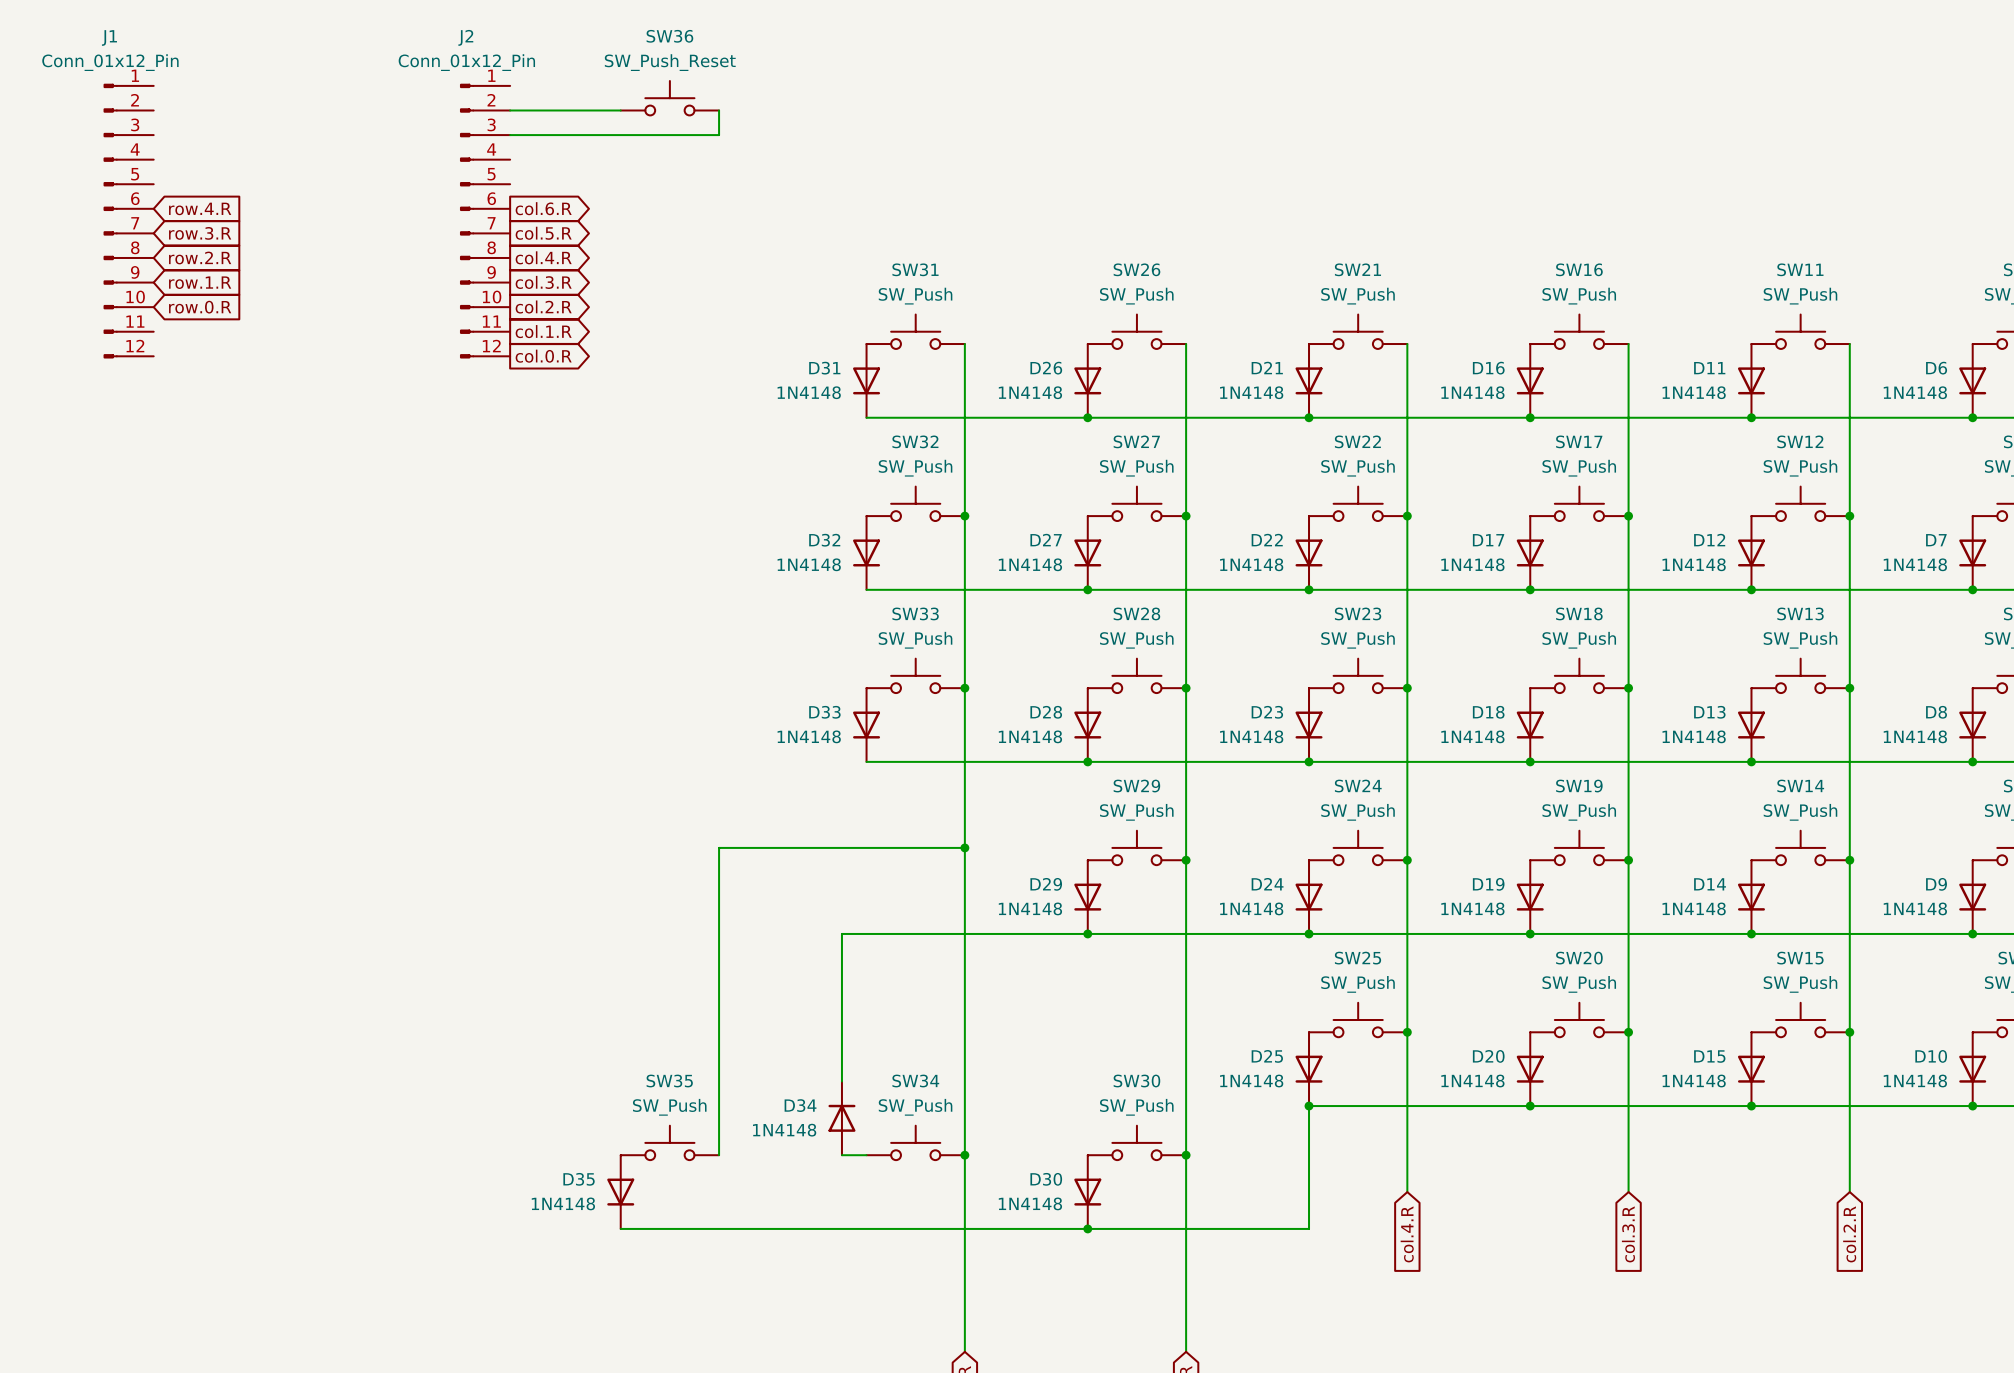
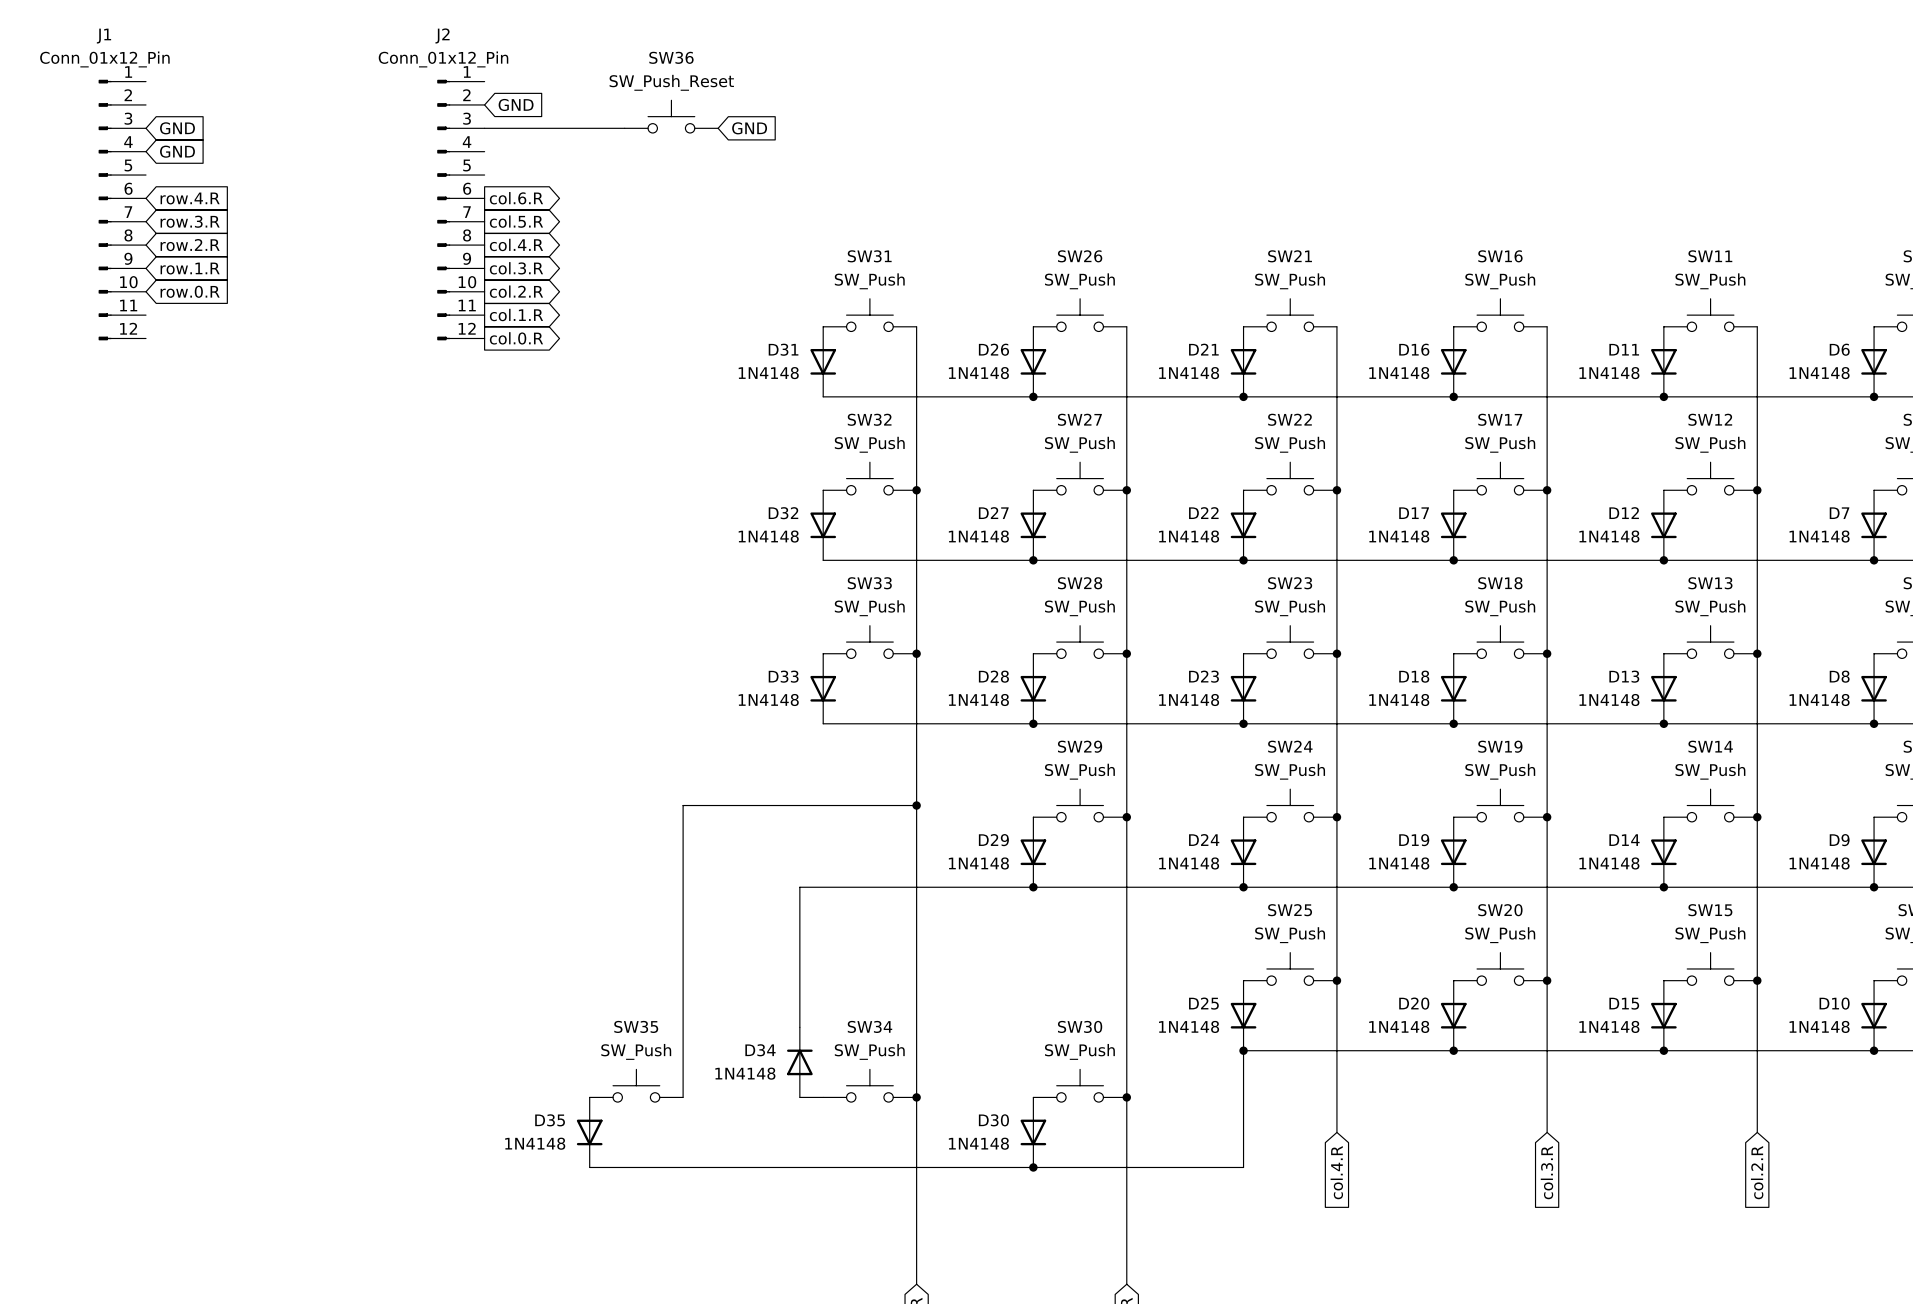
SW36 position: (669, 98) -> (671, 116)
wire: (510, 110) (620, 110) -> none
global label: none -> GND (516, 104)
wire: (719, 110) (719, 135) (657, 135) -> none
global label: none -> GND (177, 128)
global label: none -> GND (749, 128)
global label: none -> GND (177, 151)

